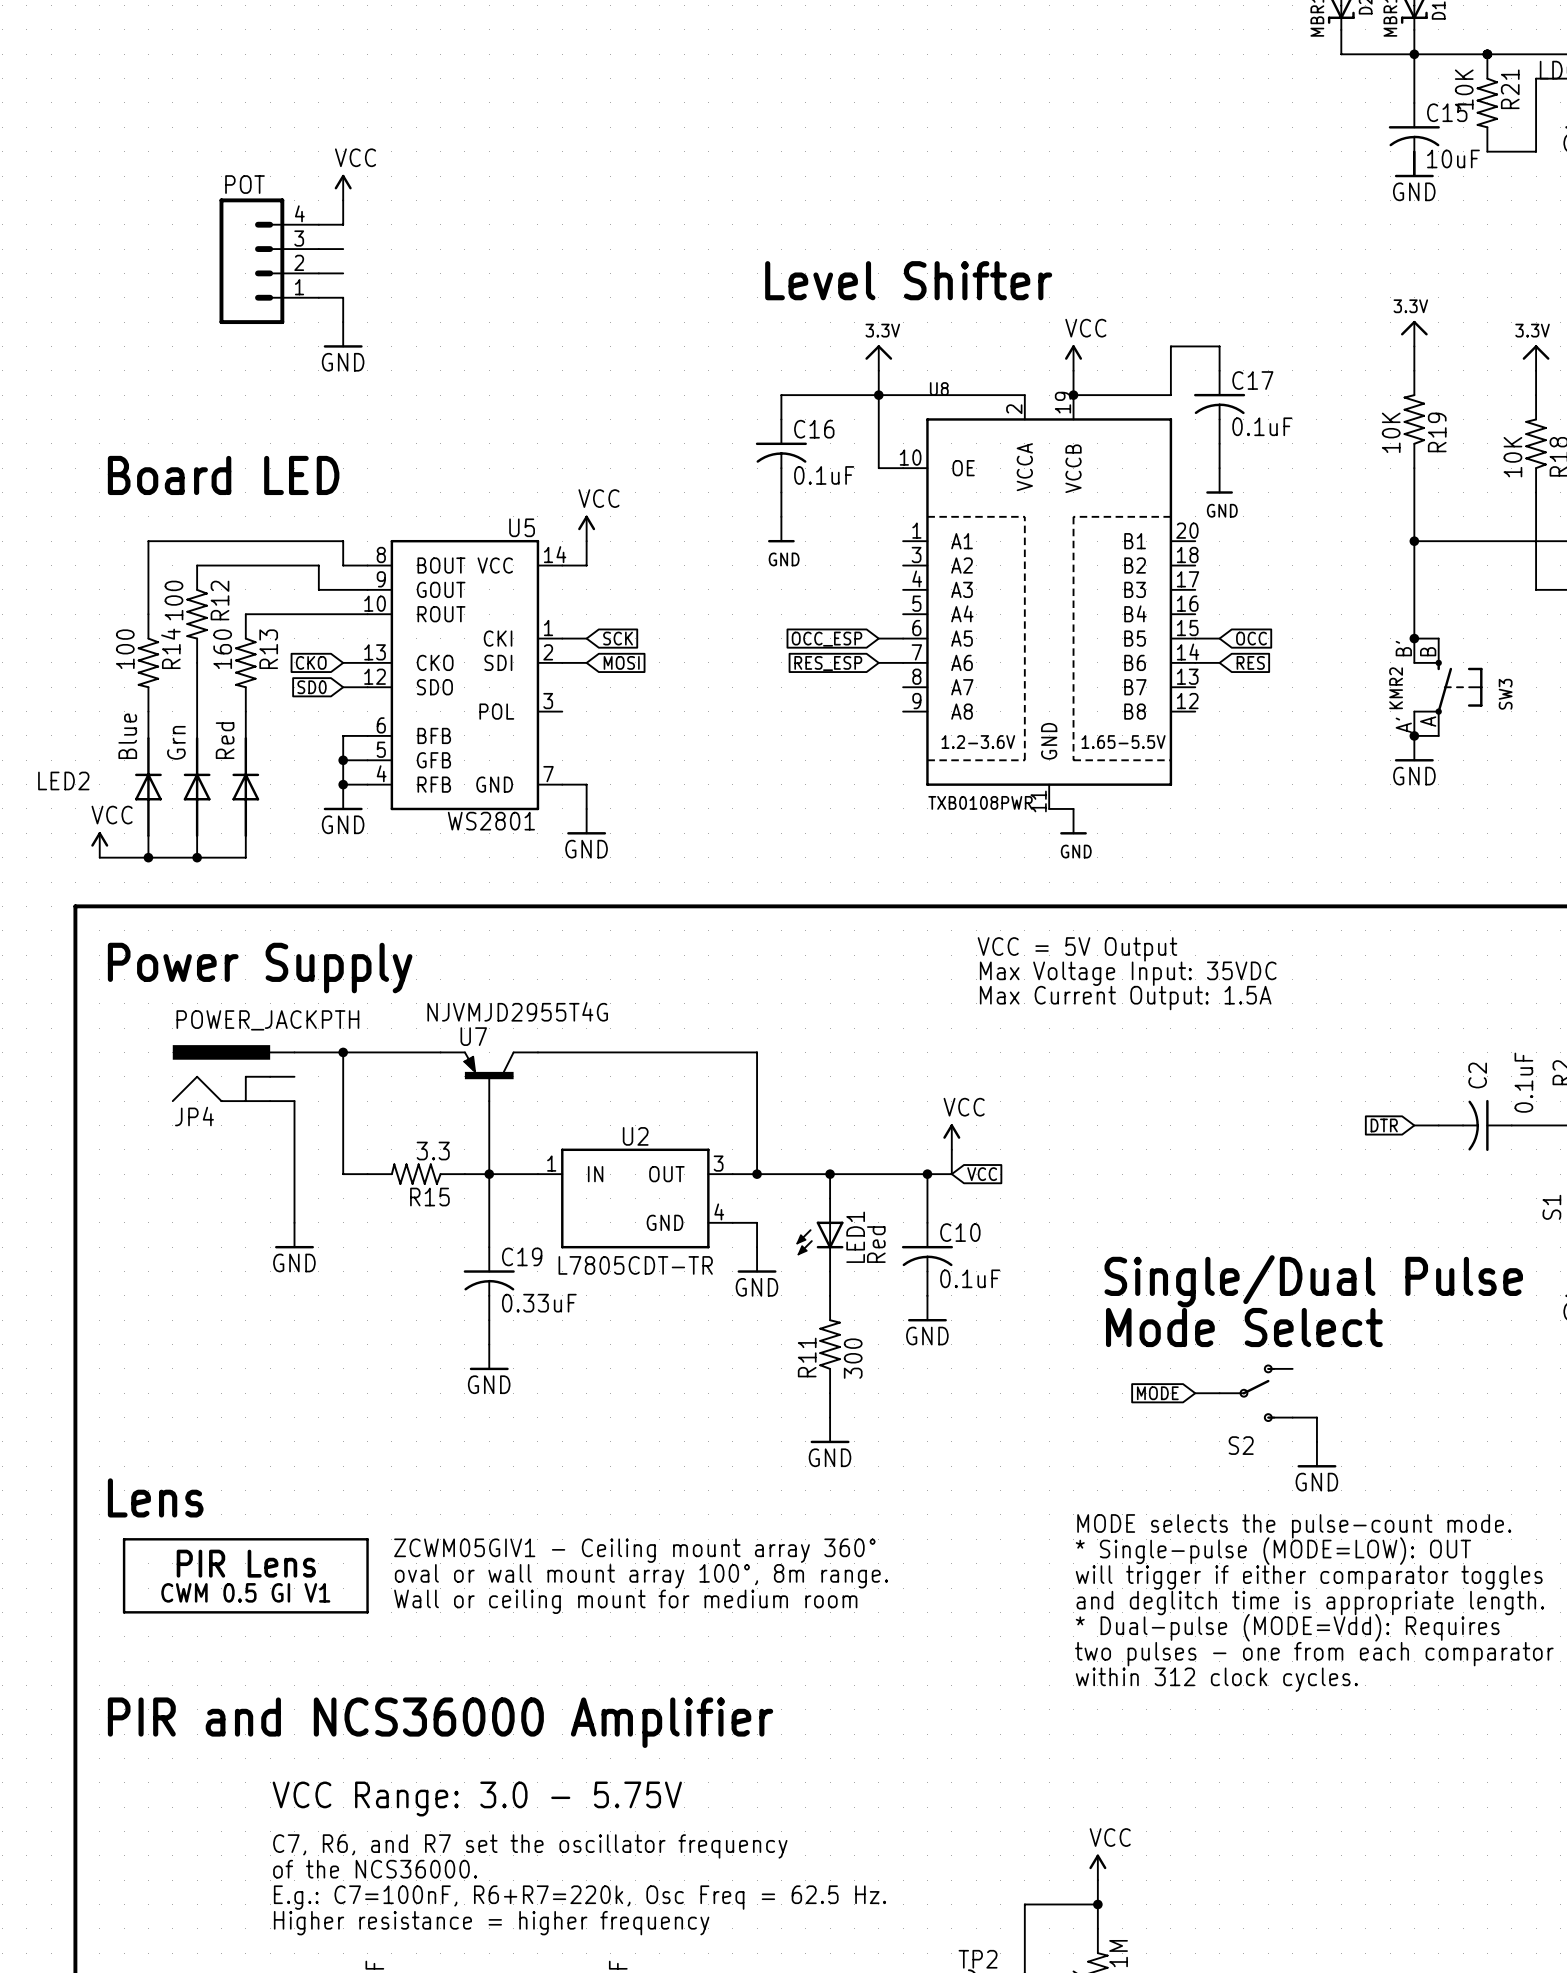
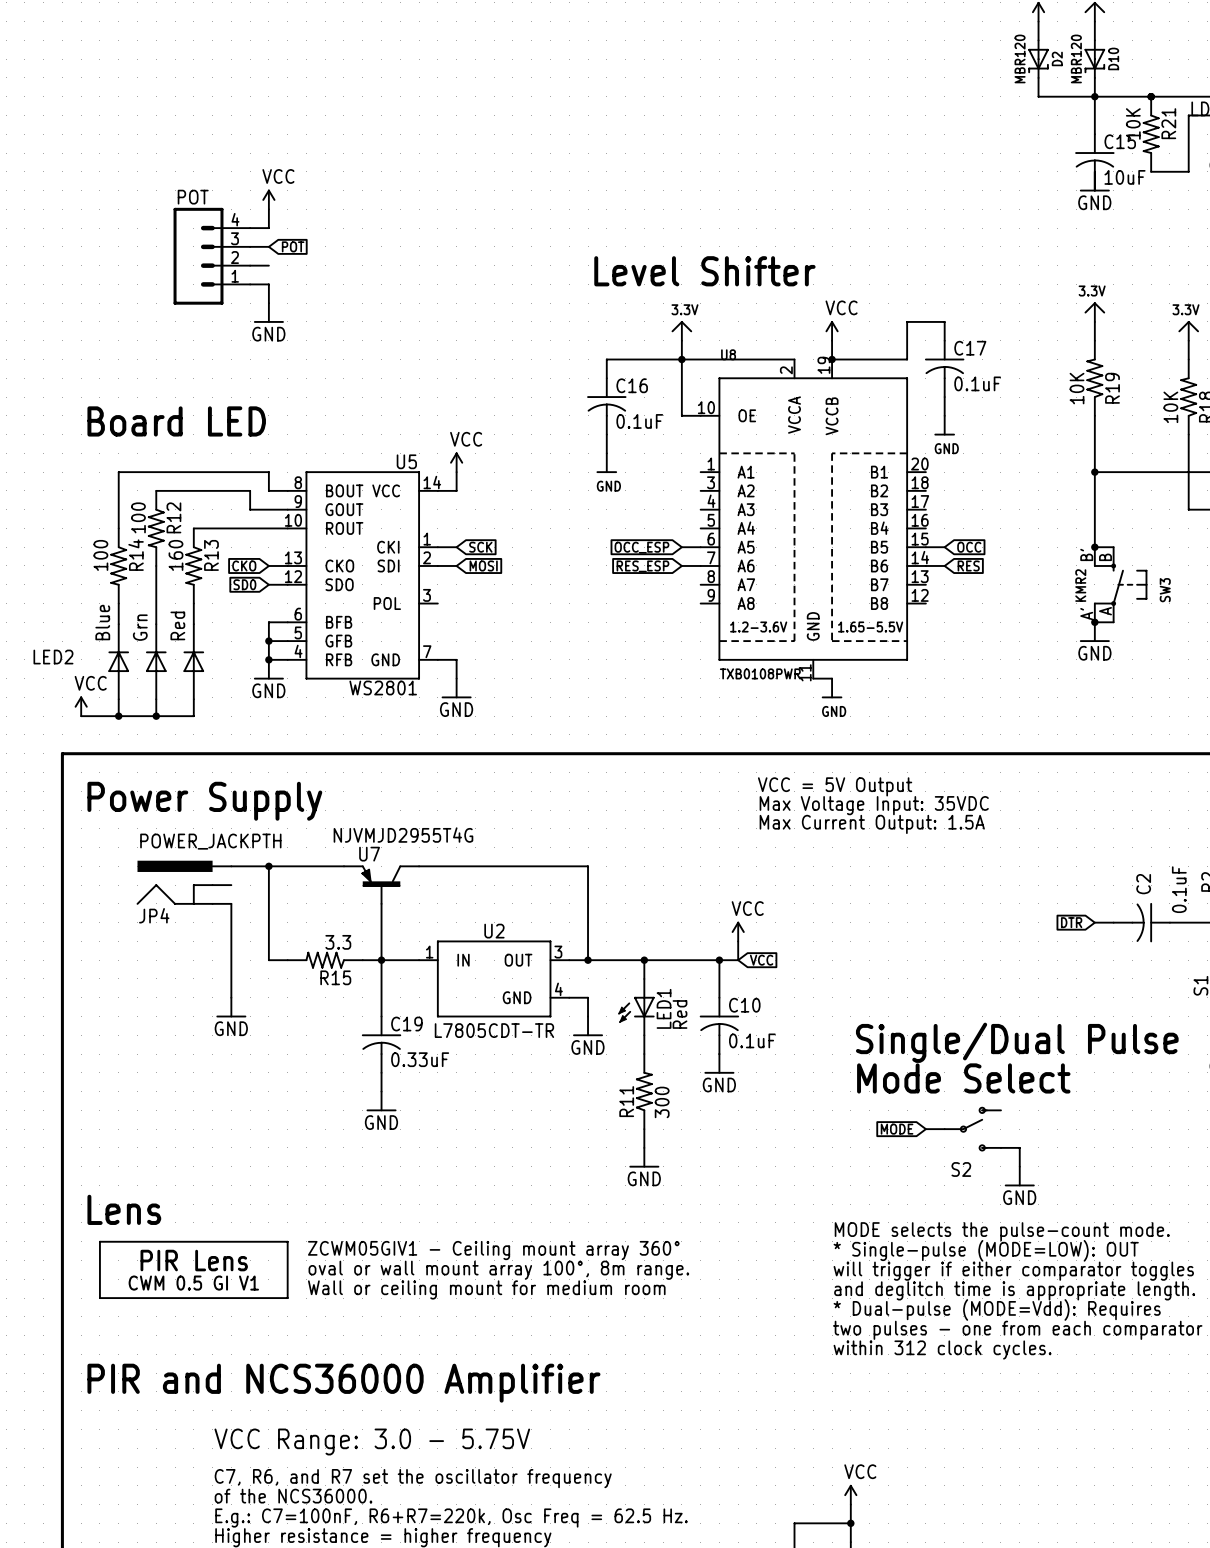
global label: none -> POT (293, 246)

